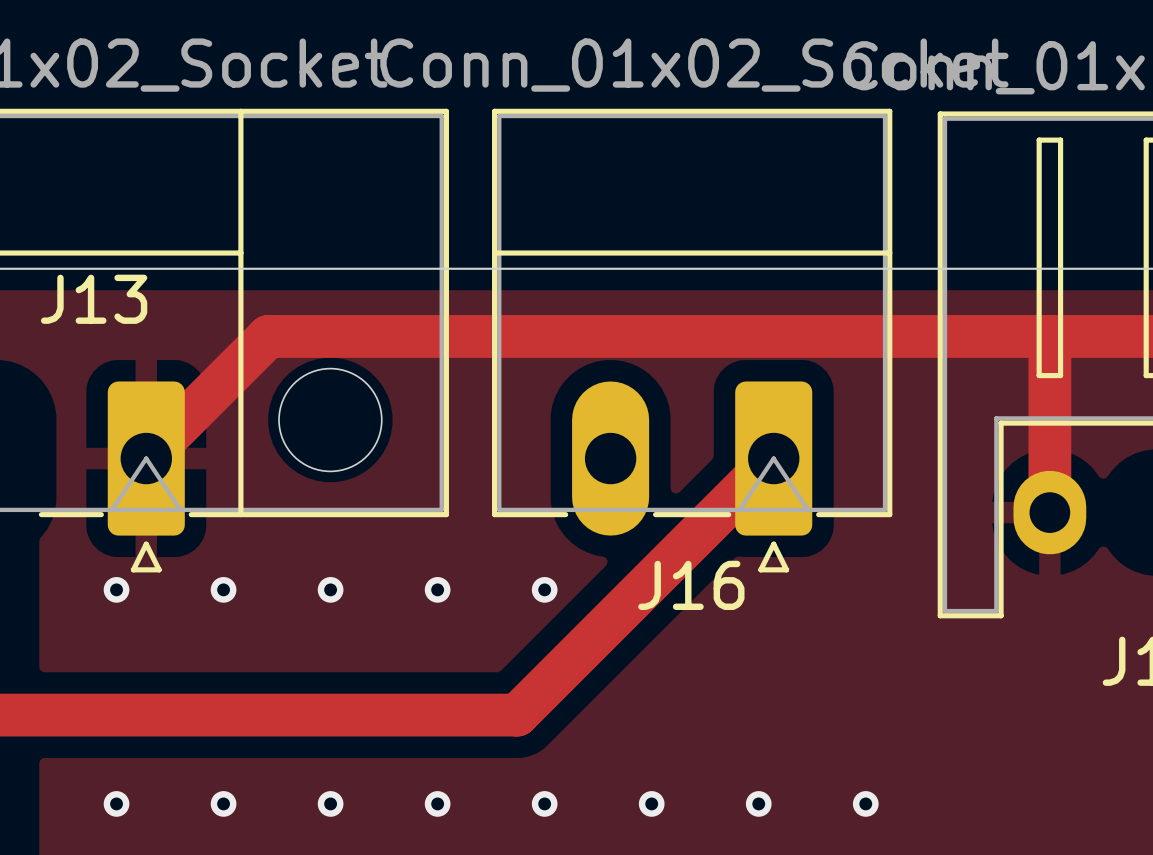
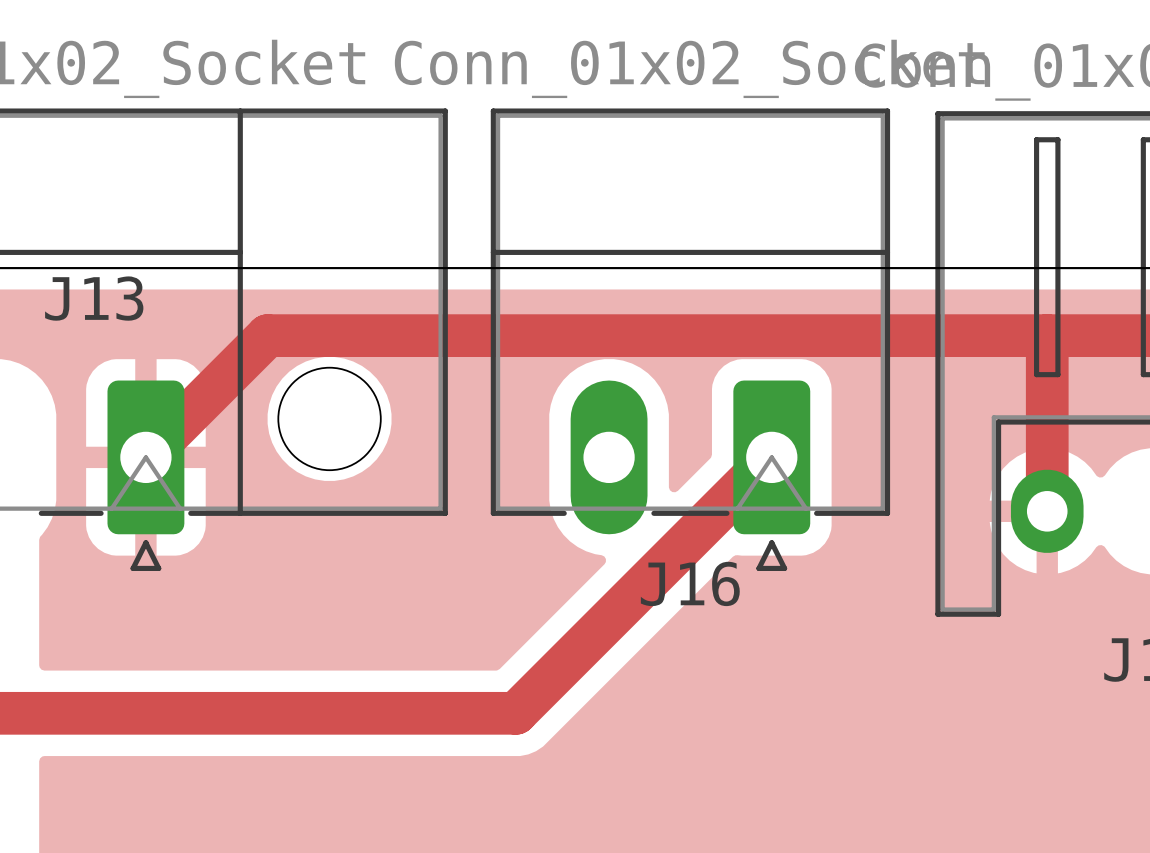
via: (116, 589) -> none
via: (223, 589) -> none
via: (330, 589) -> none
via: (437, 589) -> none
via: (544, 589) -> none
via: (116, 803) -> none
via: (223, 803) -> none
via: (330, 803) -> none
via: (437, 803) -> none
via: (544, 803) -> none
via: (651, 803) -> none
via: (758, 803) -> none
via: (865, 803) -> none

